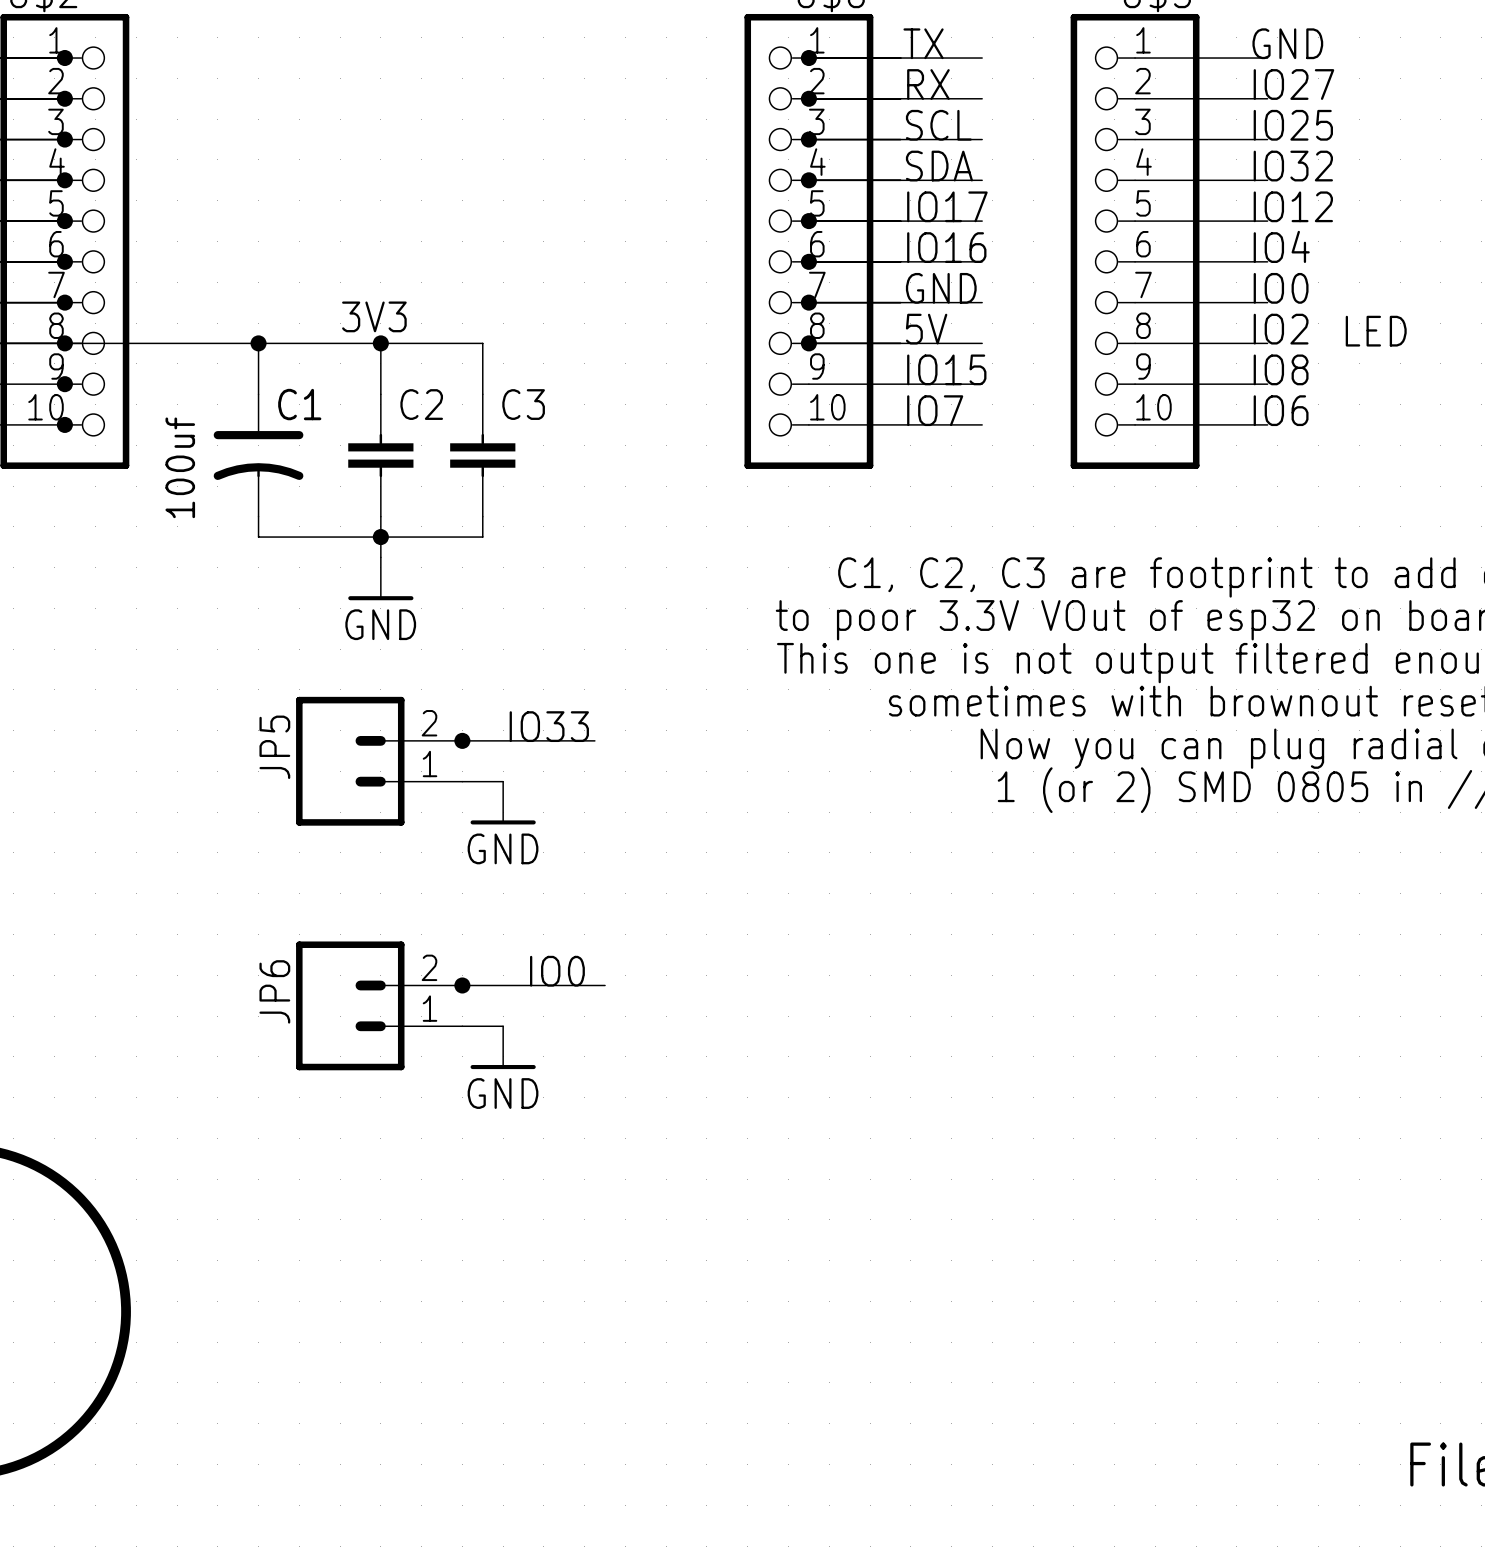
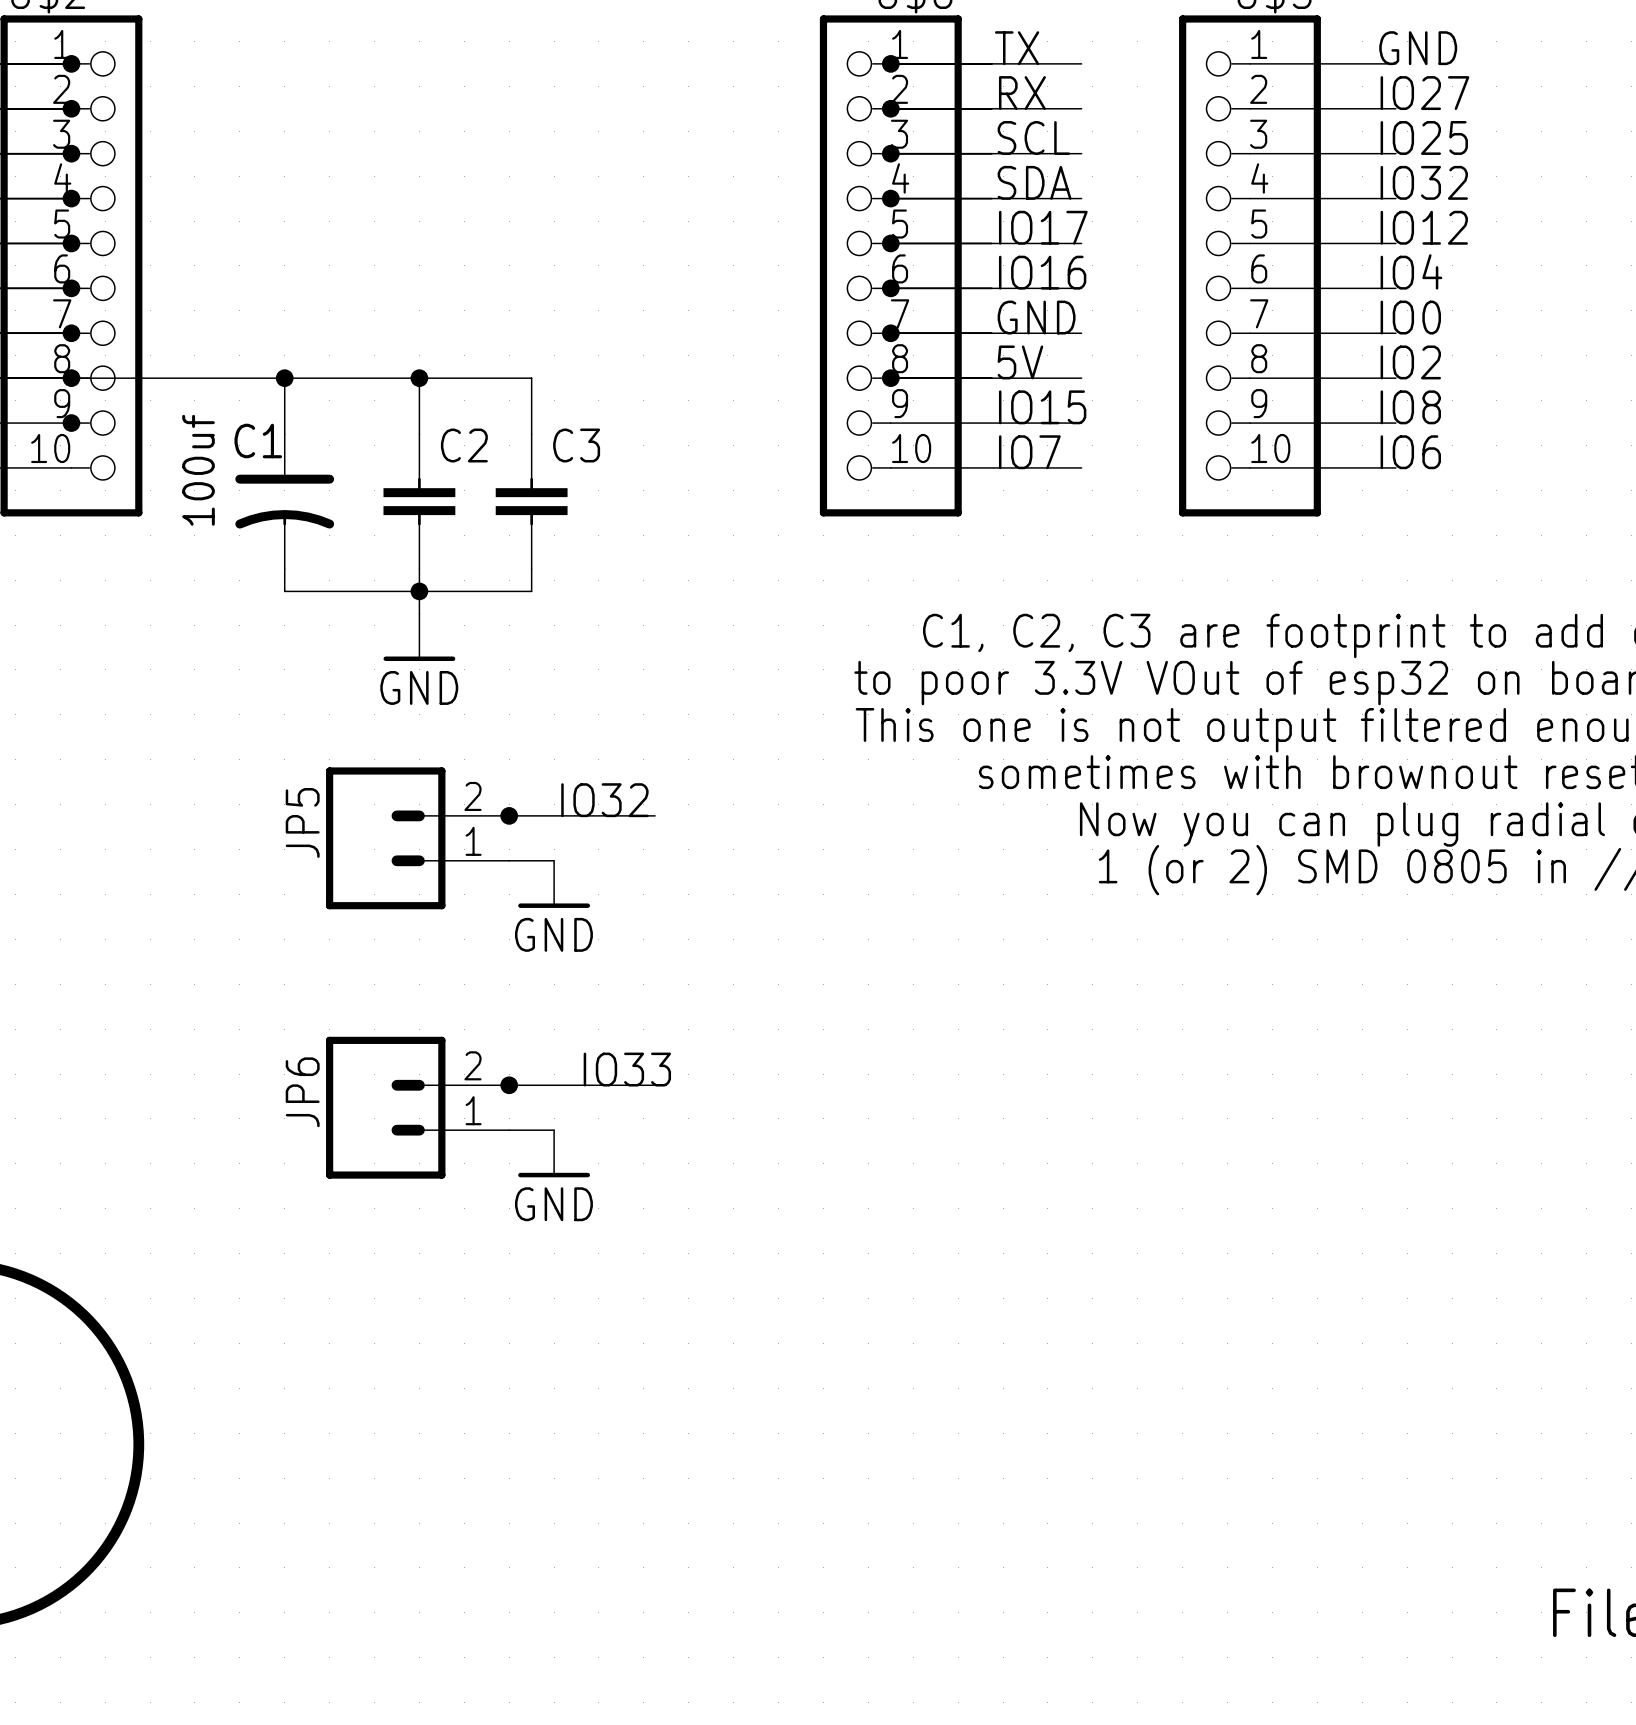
label: 3V3 (374, 316) -> none
text: LED (1376, 331) -> none
C1 name position: C1 (299, 404) -> C1 (258, 441)
junction: (64, 424) -> none
C1 value position: 100uf (180, 467) -> 100uf (198, 470)
label: IO33 (549, 726) -> IO32 (604, 800)
label: IO0 (557, 971) -> IO33 (627, 1069)

